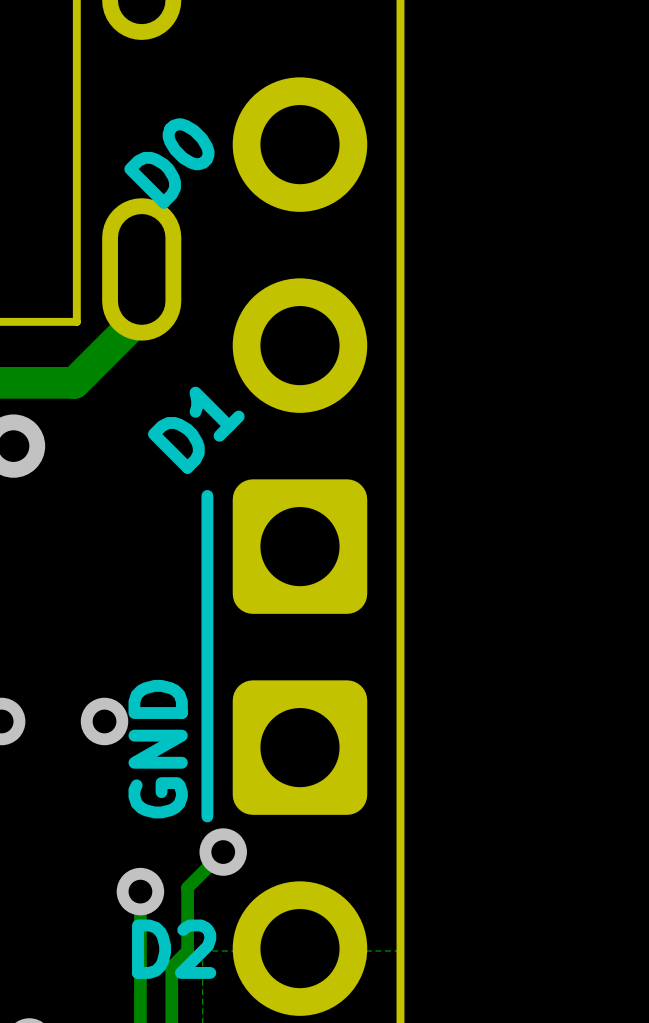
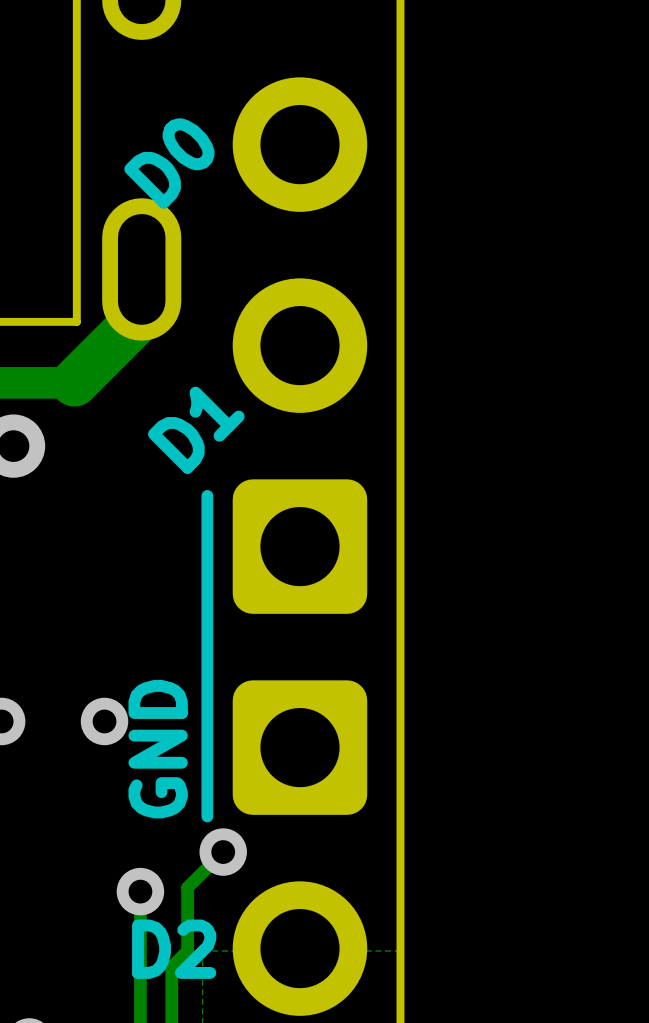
track width: thin (138, 319) (74, 382) -> thick (138, 319) (74, 382)

